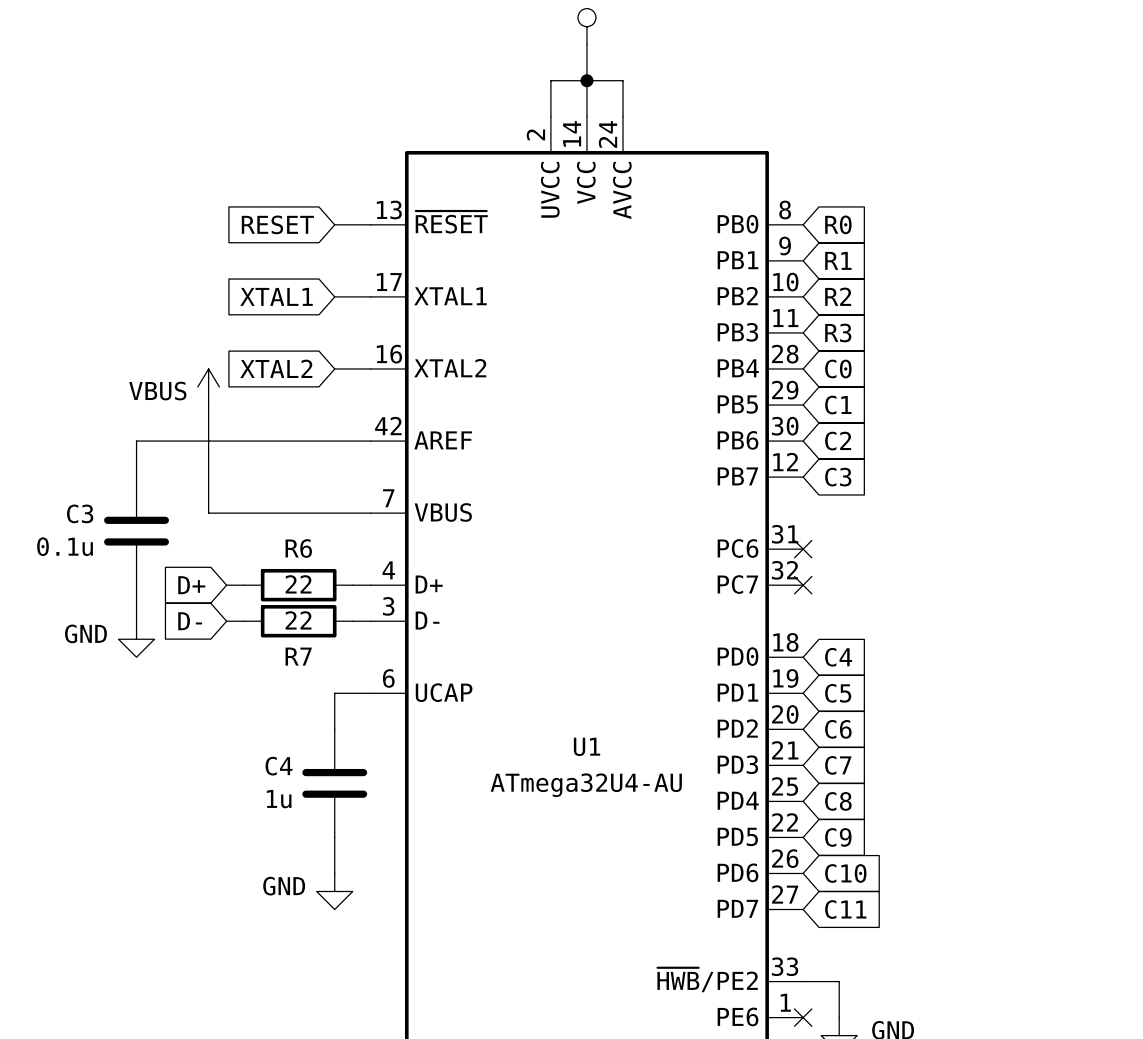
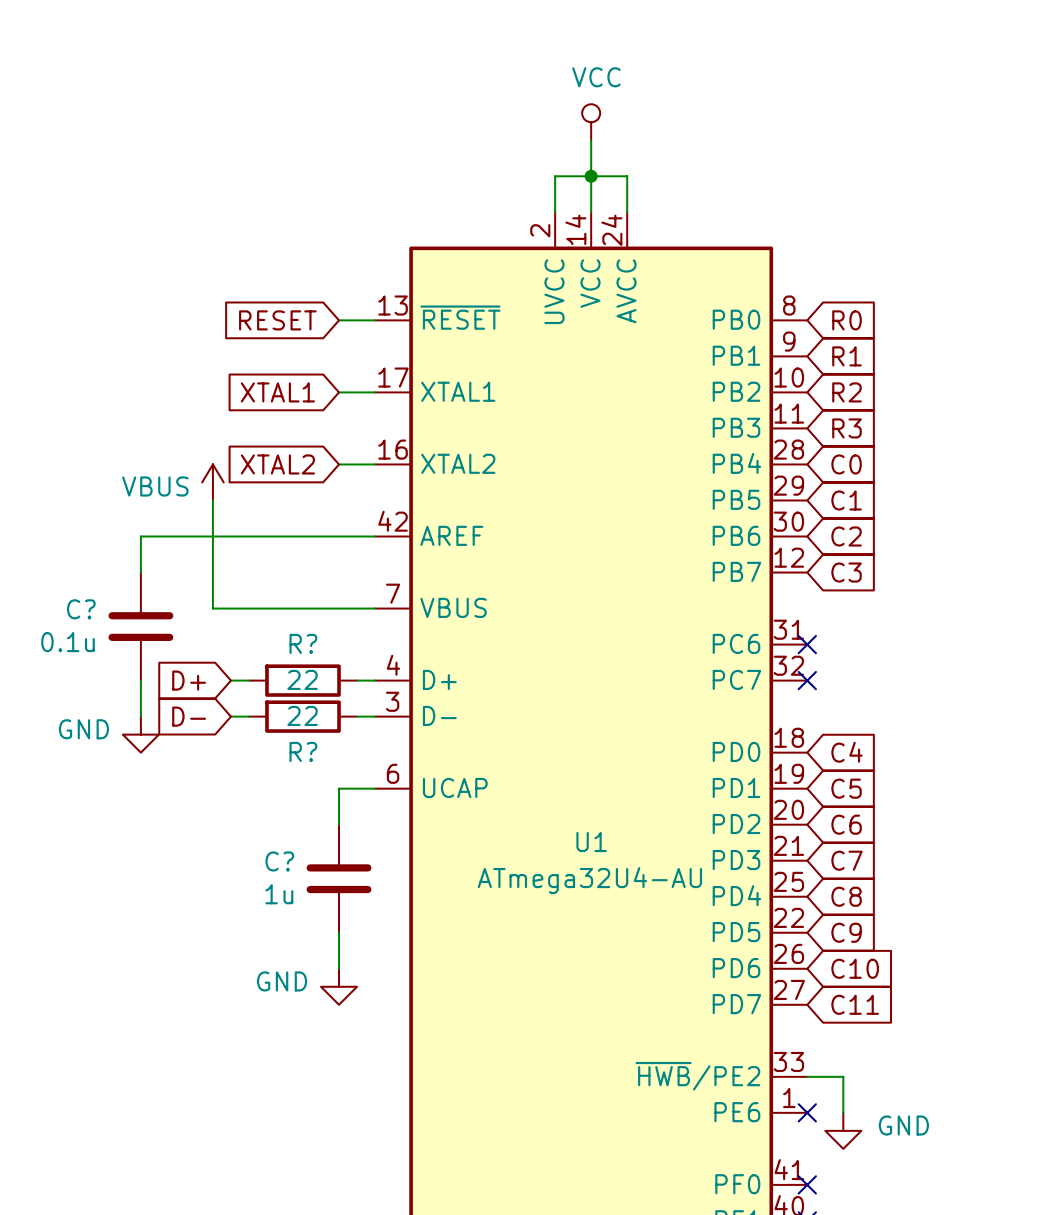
C3 name: C3 (80, 513) -> C? (81, 609)
R6 name: R6 (298, 548) -> R? (303, 643)
R7 name: R7 (298, 656) -> R? (303, 751)
C4 name: C4 (279, 766) -> C? (279, 861)

